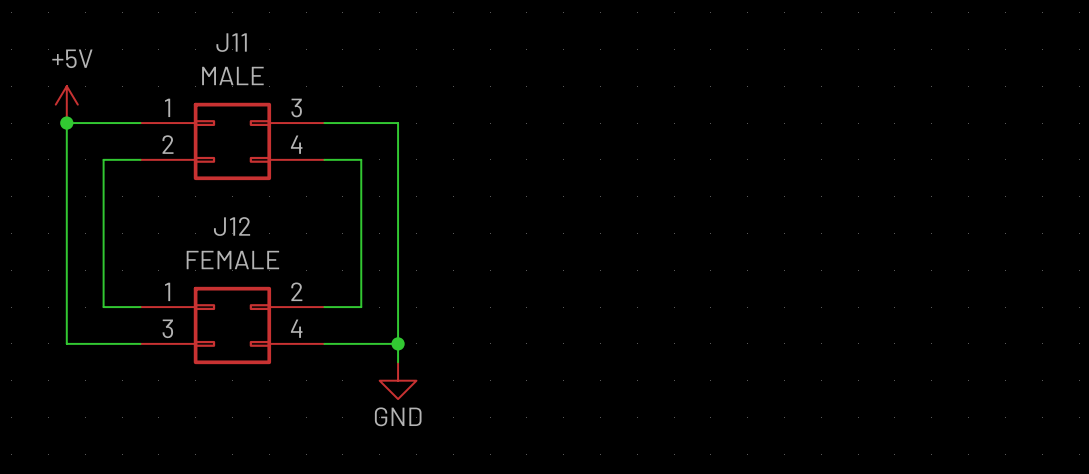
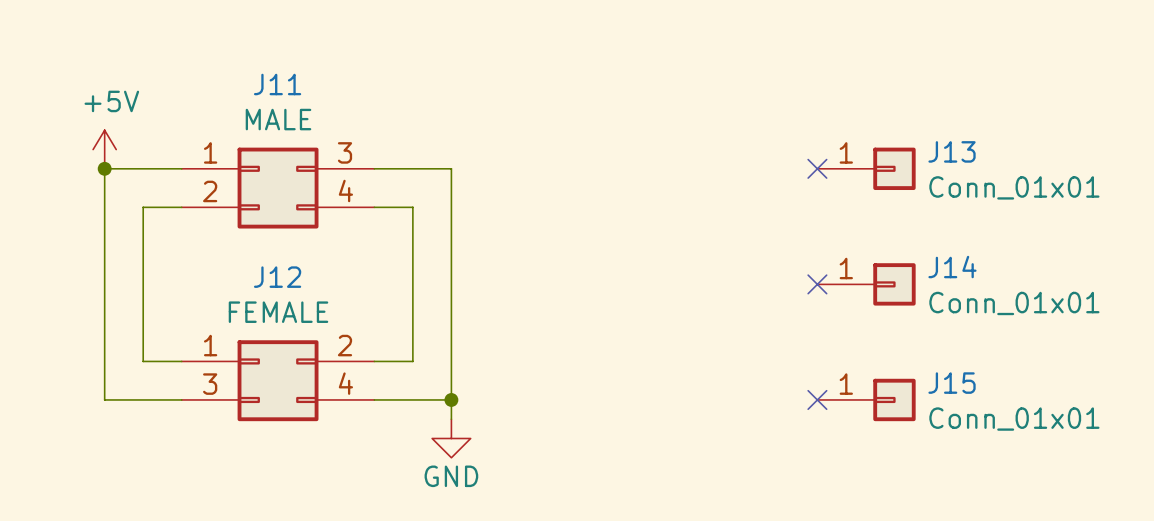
no-connect mark: none -> (817, 168)
J13: none -> Conn_01x01 (866, 168)
no-connect mark: none -> (817, 284)
J14: none -> Conn_01x01 (866, 284)
no-connect mark: none -> (817, 399)
J15: none -> Conn_01x01 (866, 399)

